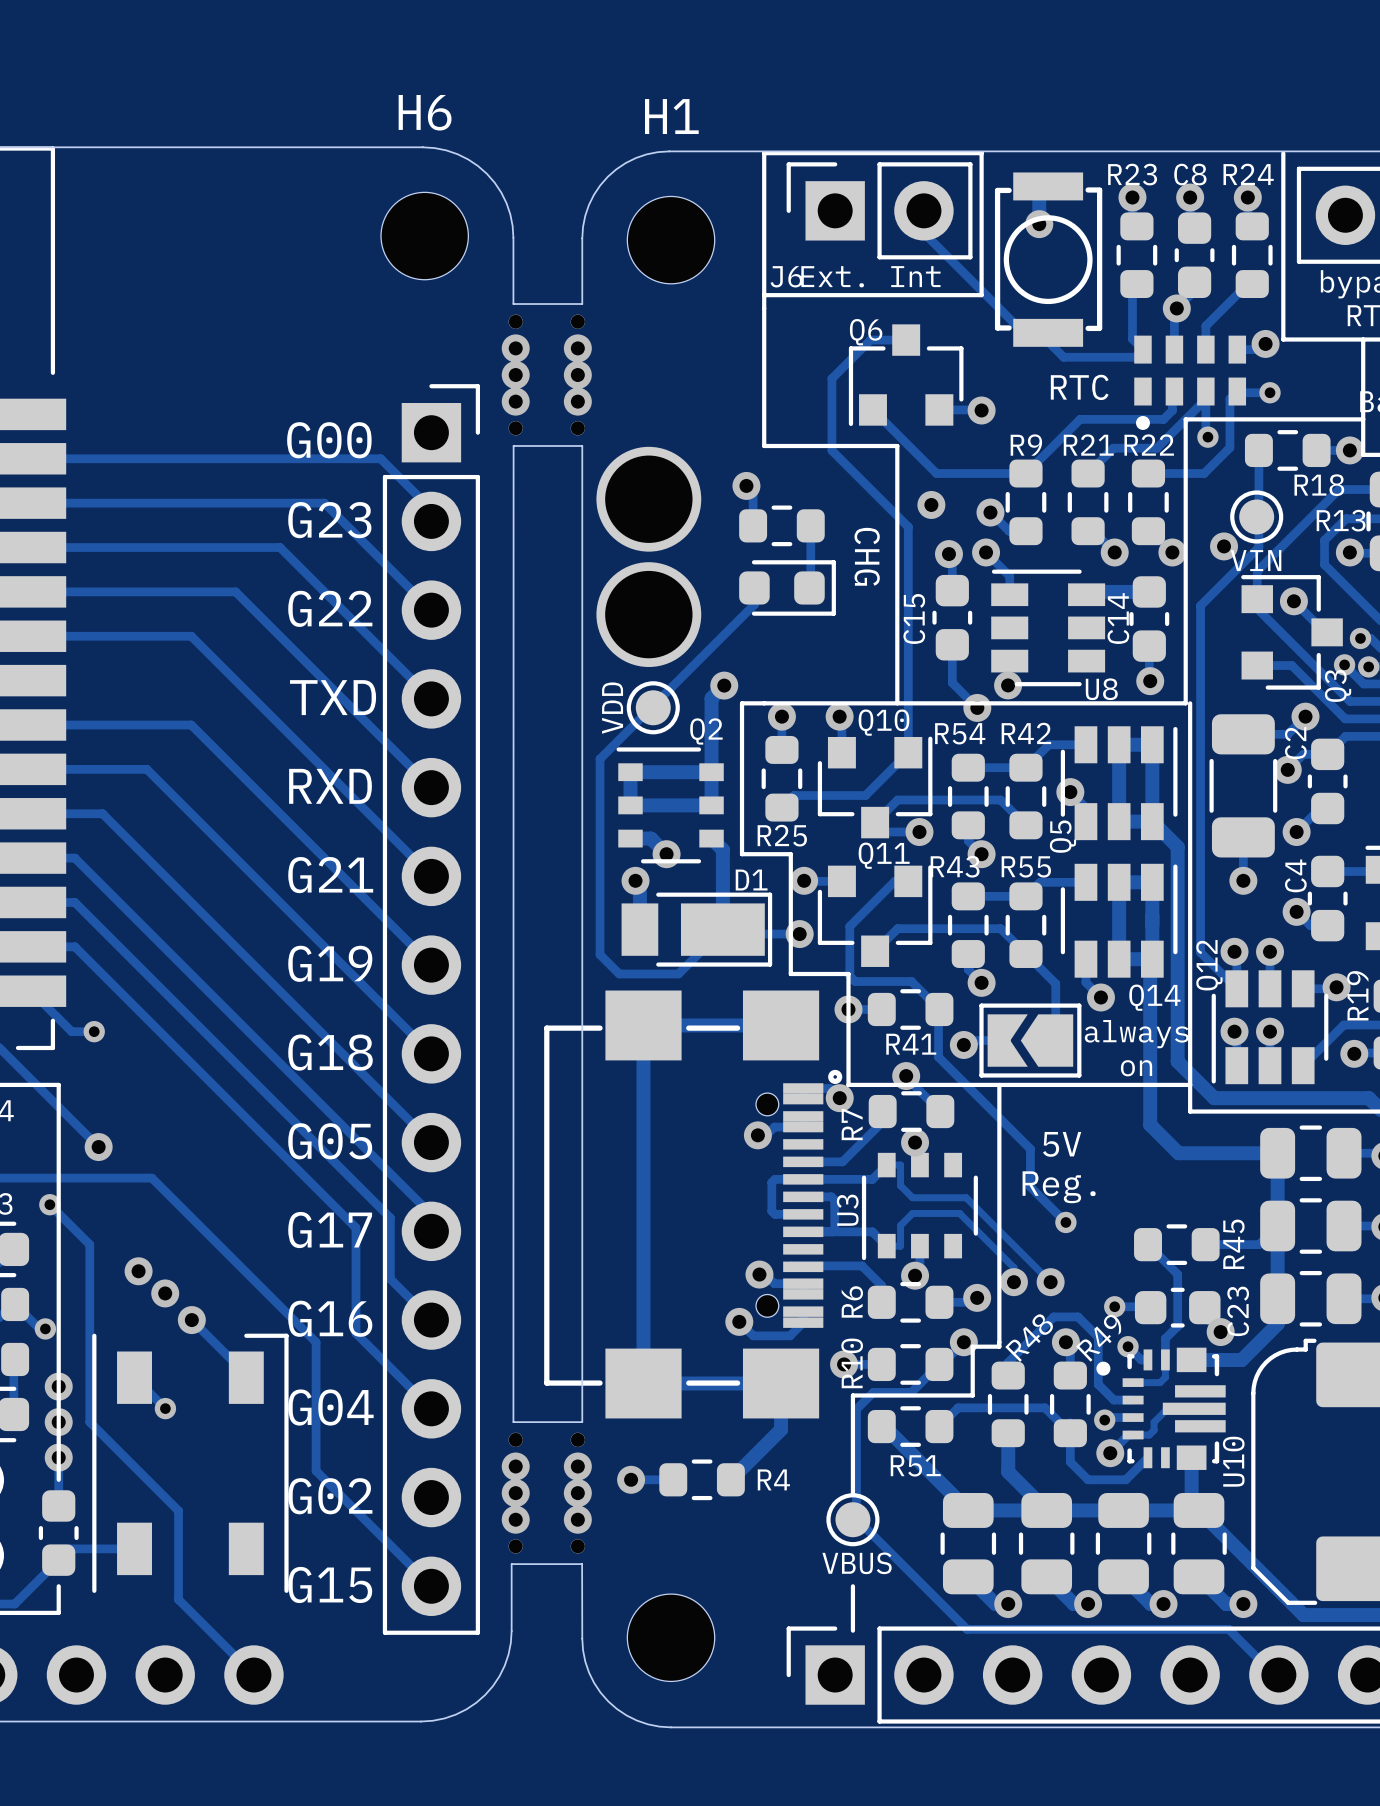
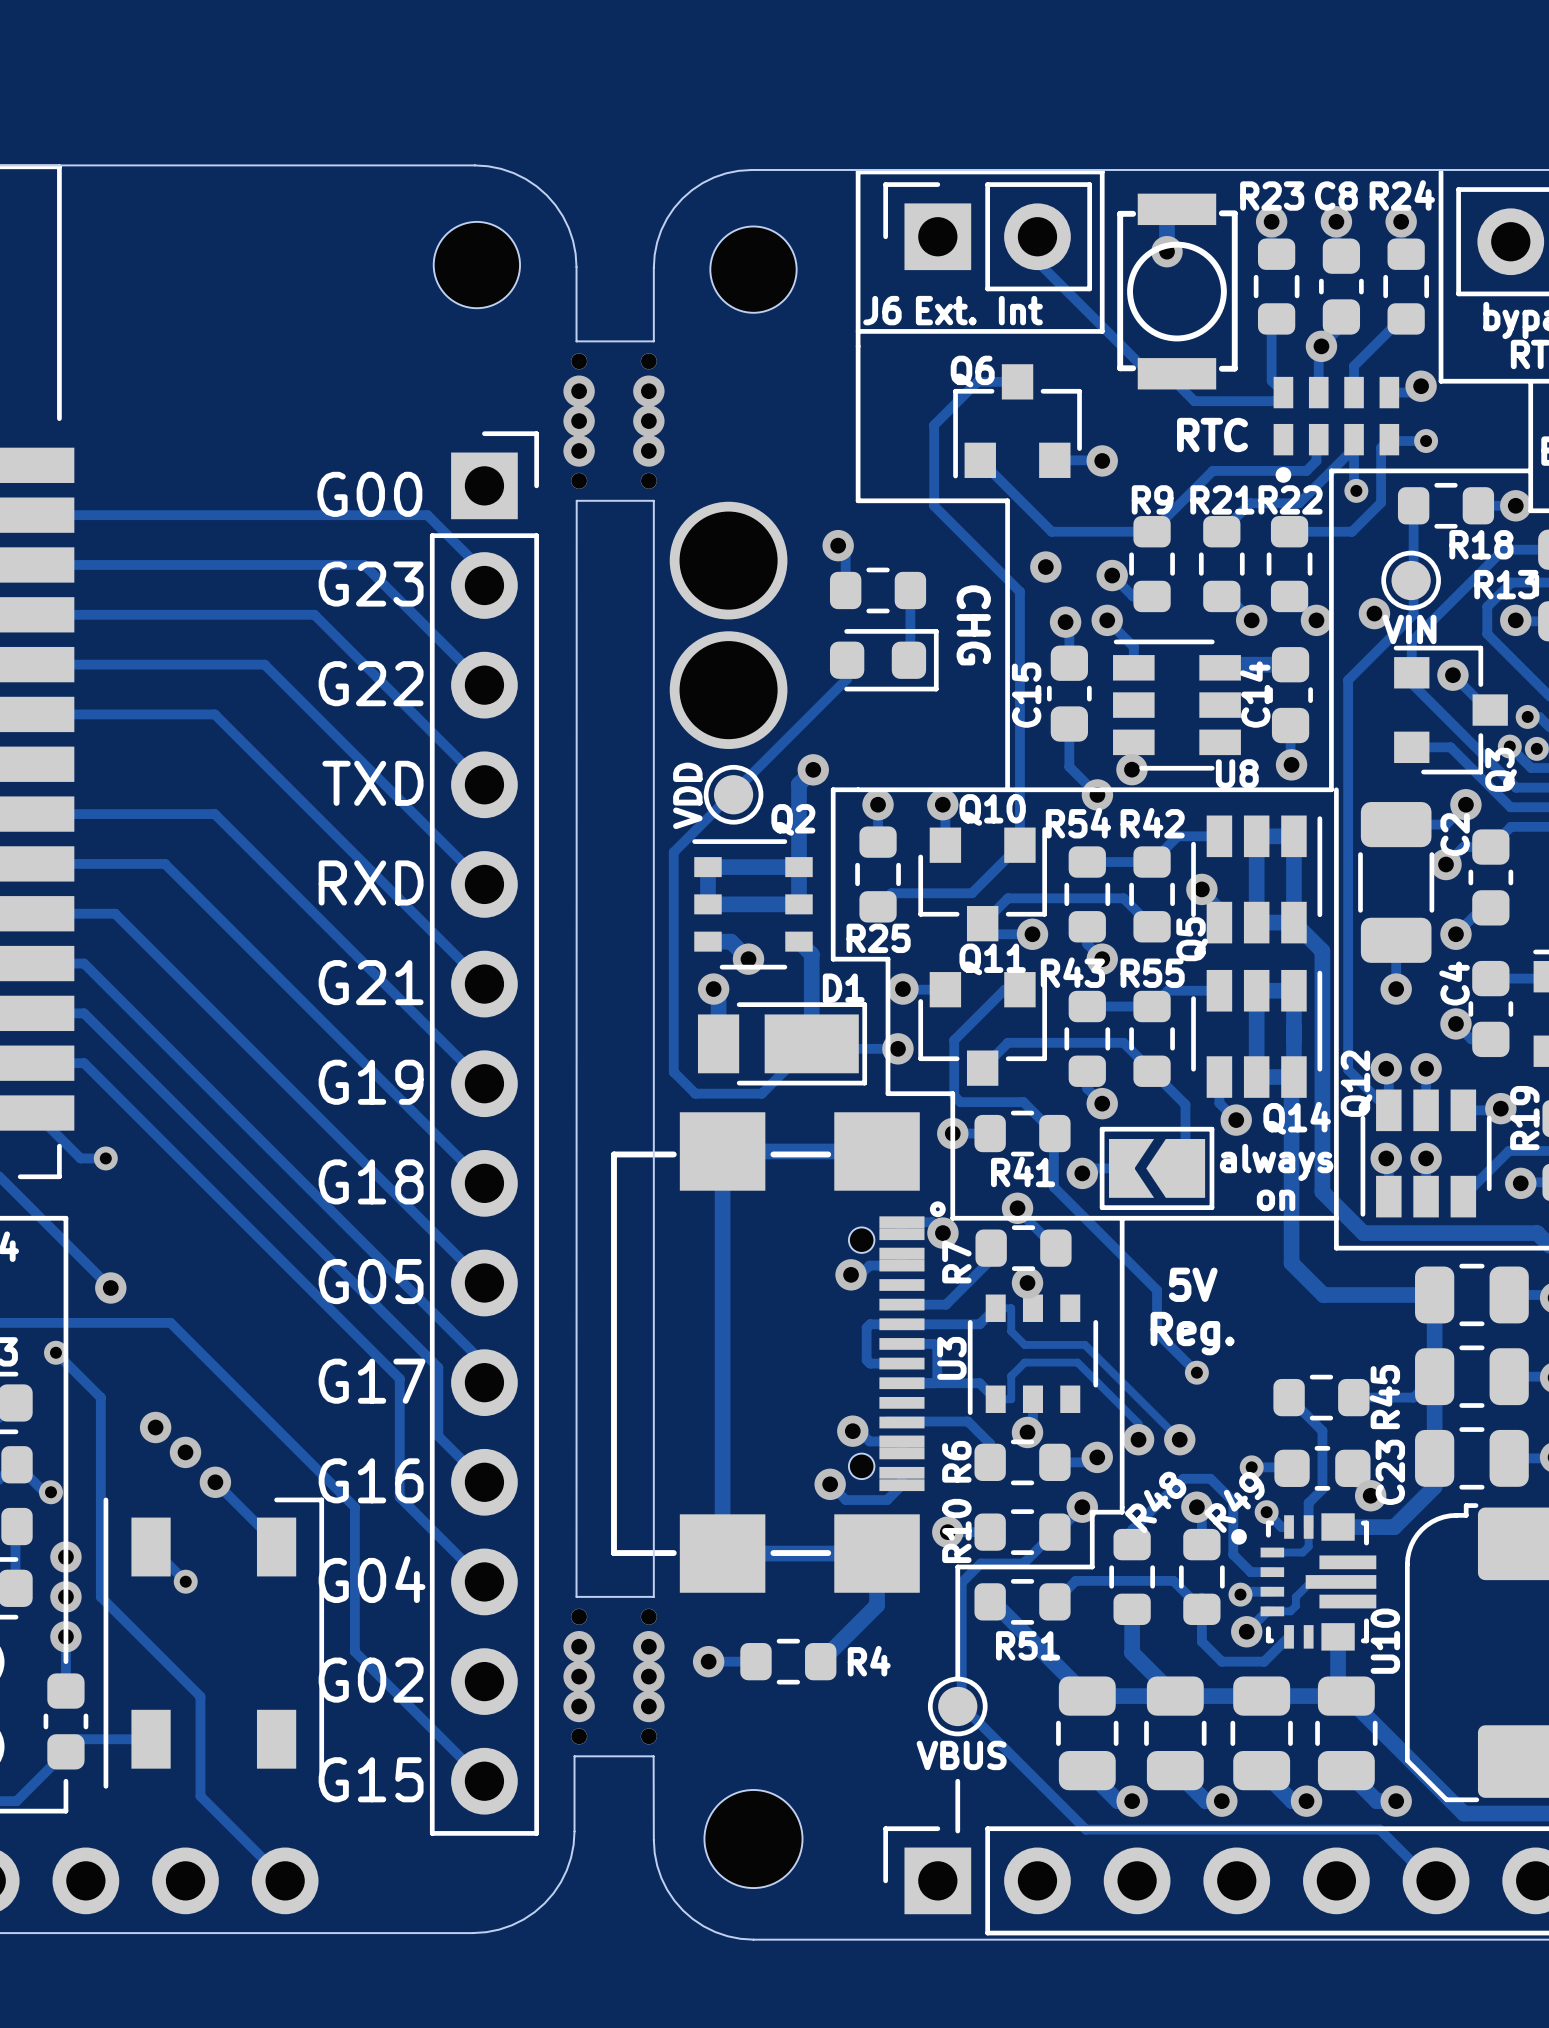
H6: (424, 236) -> none
part: none -> (476, 265)
H1: (671, 240) -> none
part: none -> (753, 269)

